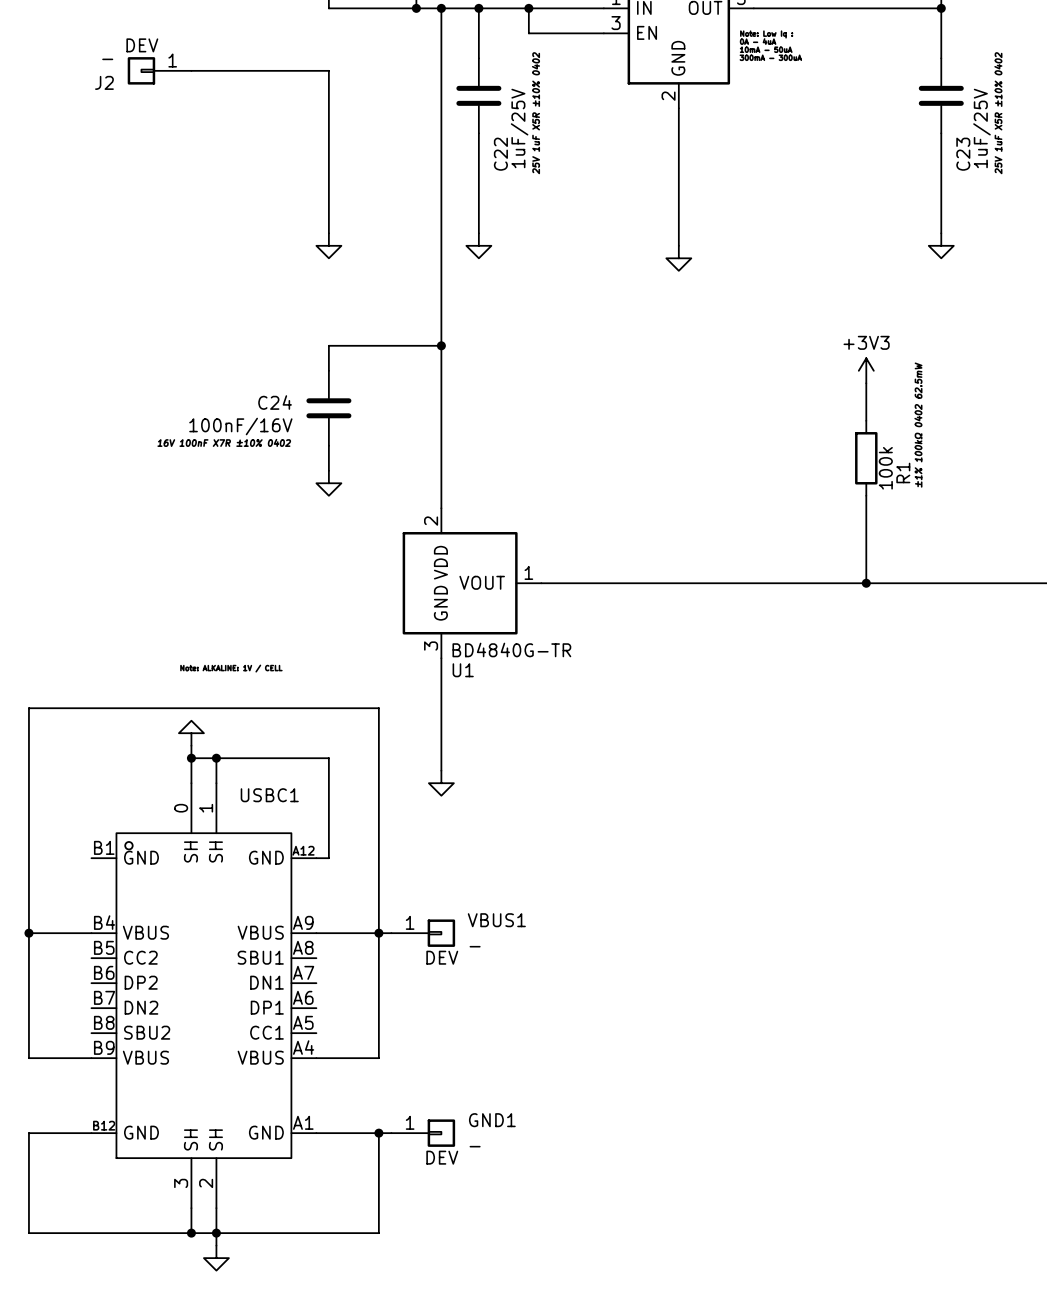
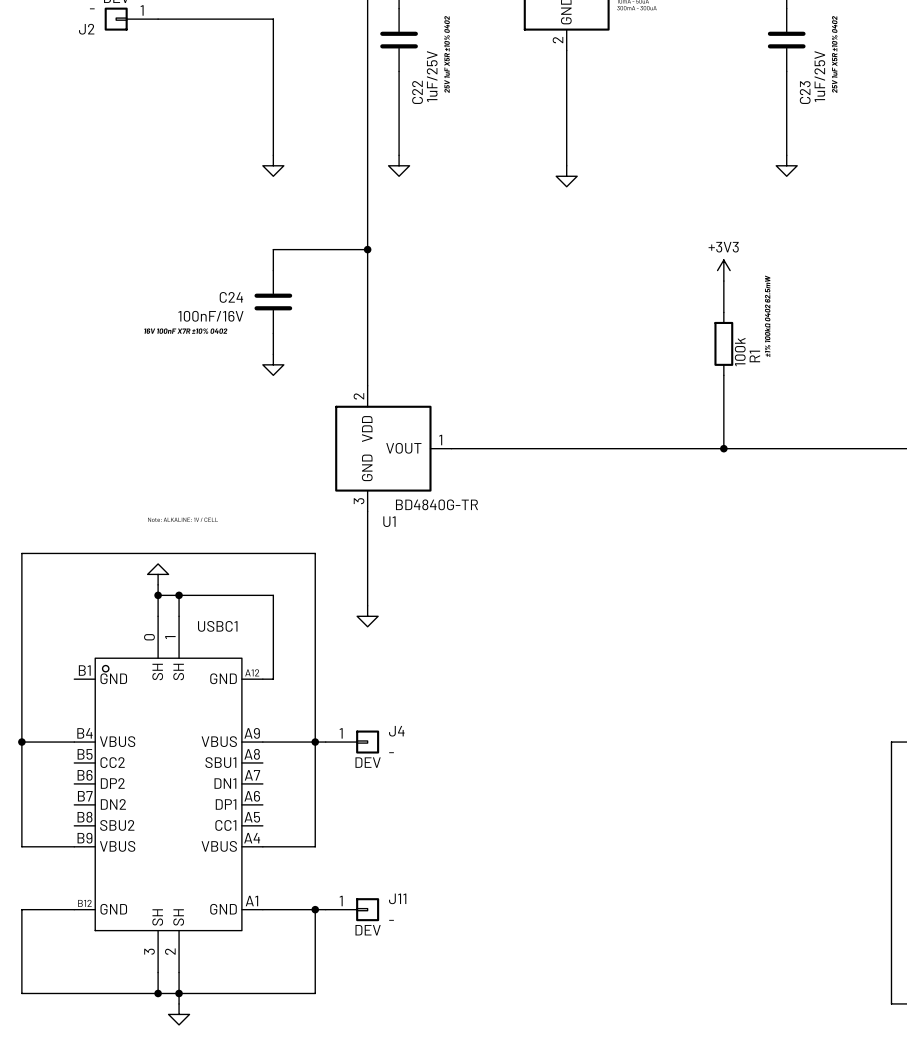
VBUS1 name: VBUS1 (496, 920) -> J4 (396, 731)
GND1 name: GND1 (492, 1120) -> J11 (397, 898)

